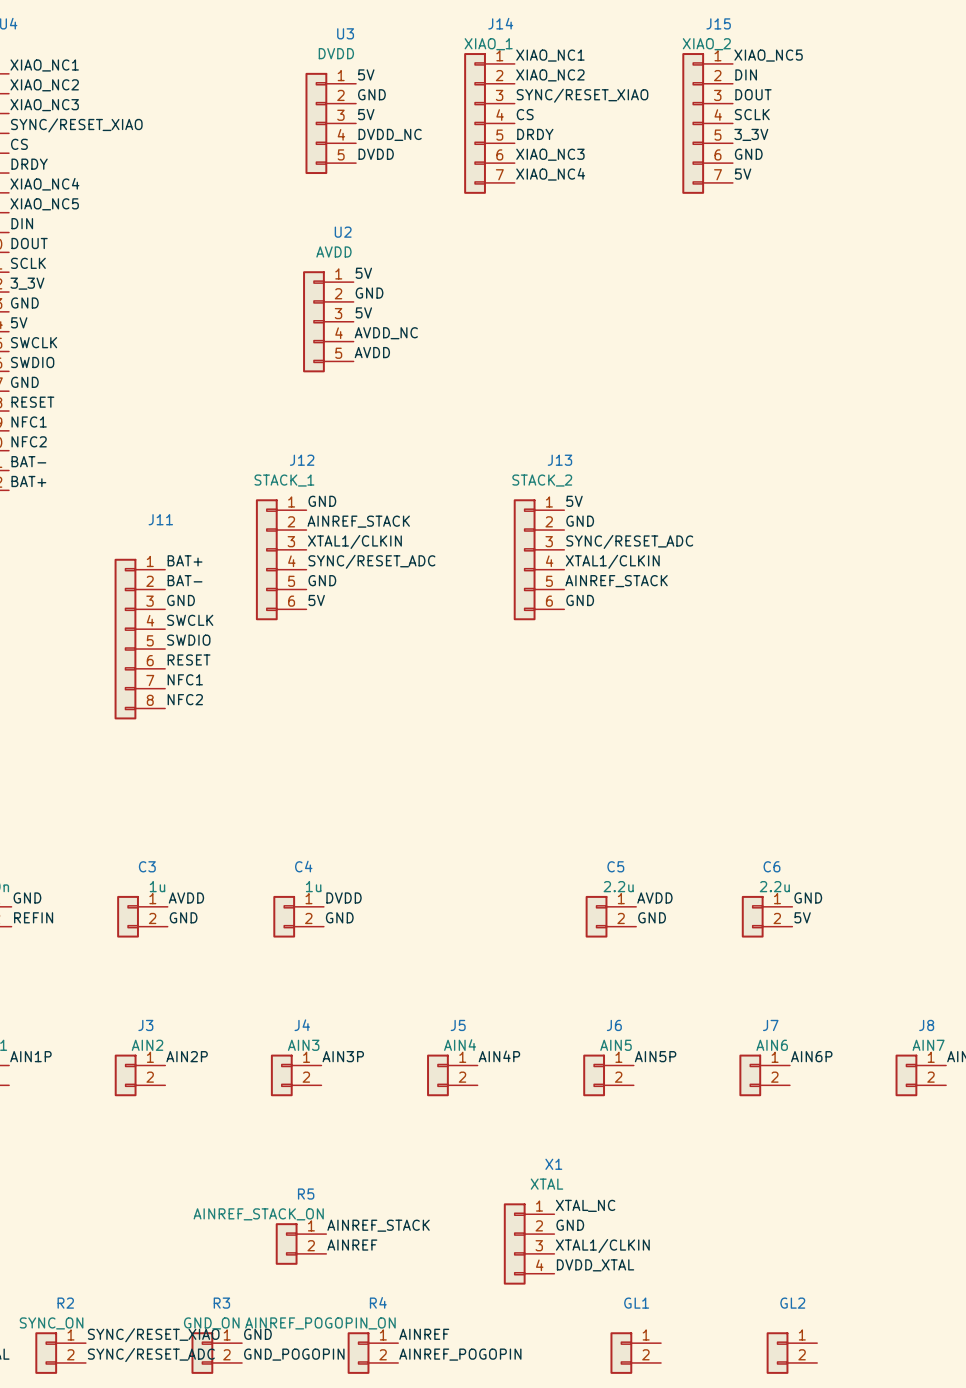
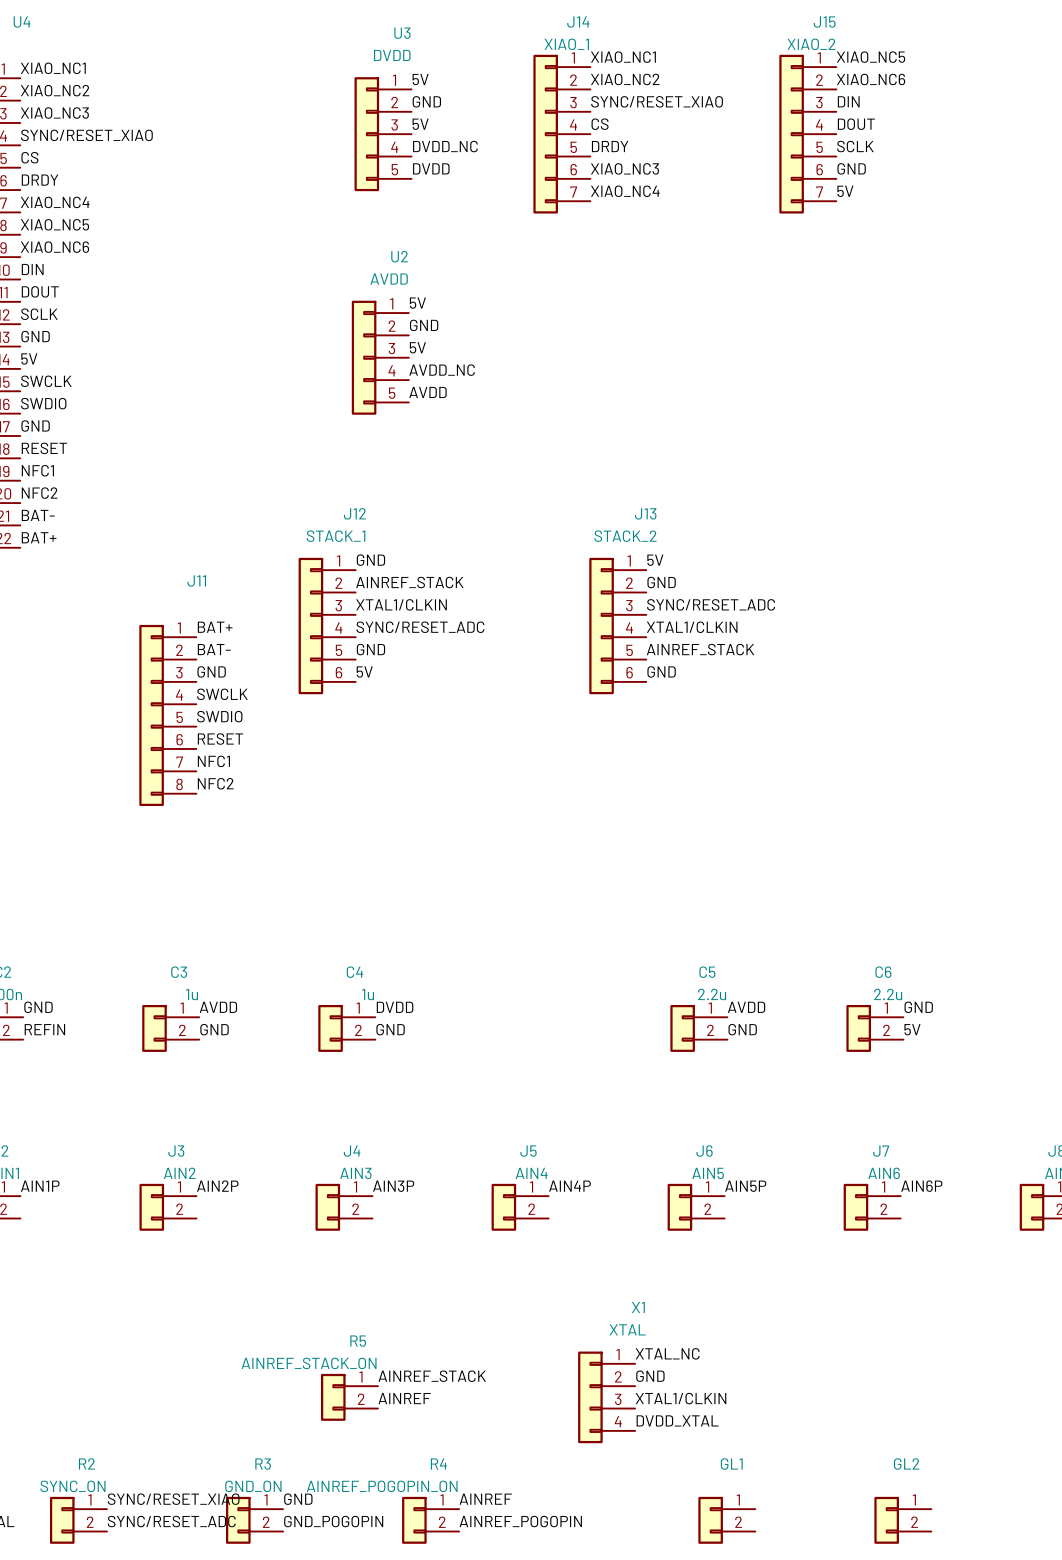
label: DIN (746, 74) -> XIAO_NC6 (871, 79)
label: DOUT (753, 94) -> DIN (848, 101)
label: SCLK (752, 114) -> DOUT (856, 124)
label: 3_3V (751, 134) -> SCLK (855, 146)
label: DIN (22, 223) -> XIAO_NC6 (54, 247)
label: DOUT (29, 243) -> DIN (32, 269)
label: SCLK (28, 263) -> DOUT (40, 291)
label: 3_3V (27, 283) -> SCLK (39, 314)

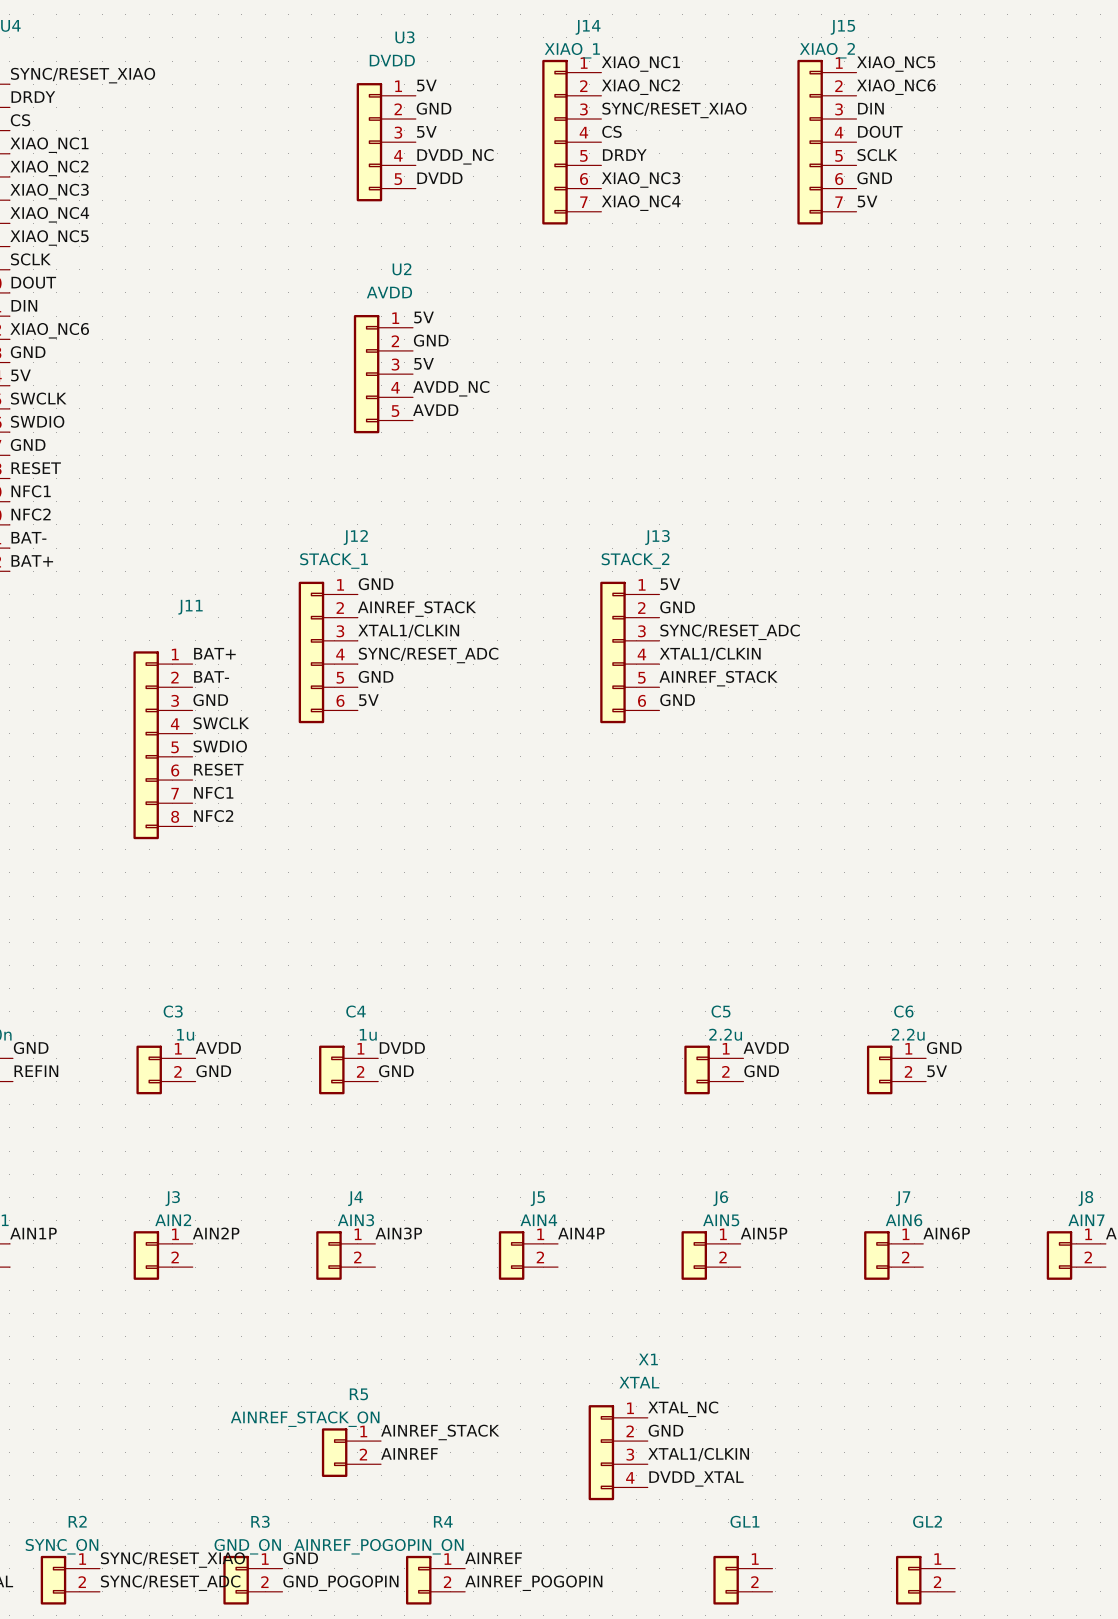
label: XIAO_NC1 (53, 68) -> SYNC/RESET_XIAO (83, 75)
label: XIAO_NC2 (55, 90) -> DRDY (33, 97)
label: XIAO_NC3 (54, 113) -> CS (20, 120)
label: SYNC/RESET_XIAO (86, 135) -> XIAO_NC1 (49, 145)
label: CS (29, 157) -> XIAO_NC2 (49, 168)
label: DRDY (40, 180) -> XIAO_NC3 (49, 191)
label: XIAO_NC6 (54, 247) -> SCLK (30, 259)
label: DIN (32, 269) -> DOUT (33, 282)
label: DOUT (40, 291) -> DIN (24, 305)
label: SCLK (39, 314) -> XIAO_NC6 (49, 330)

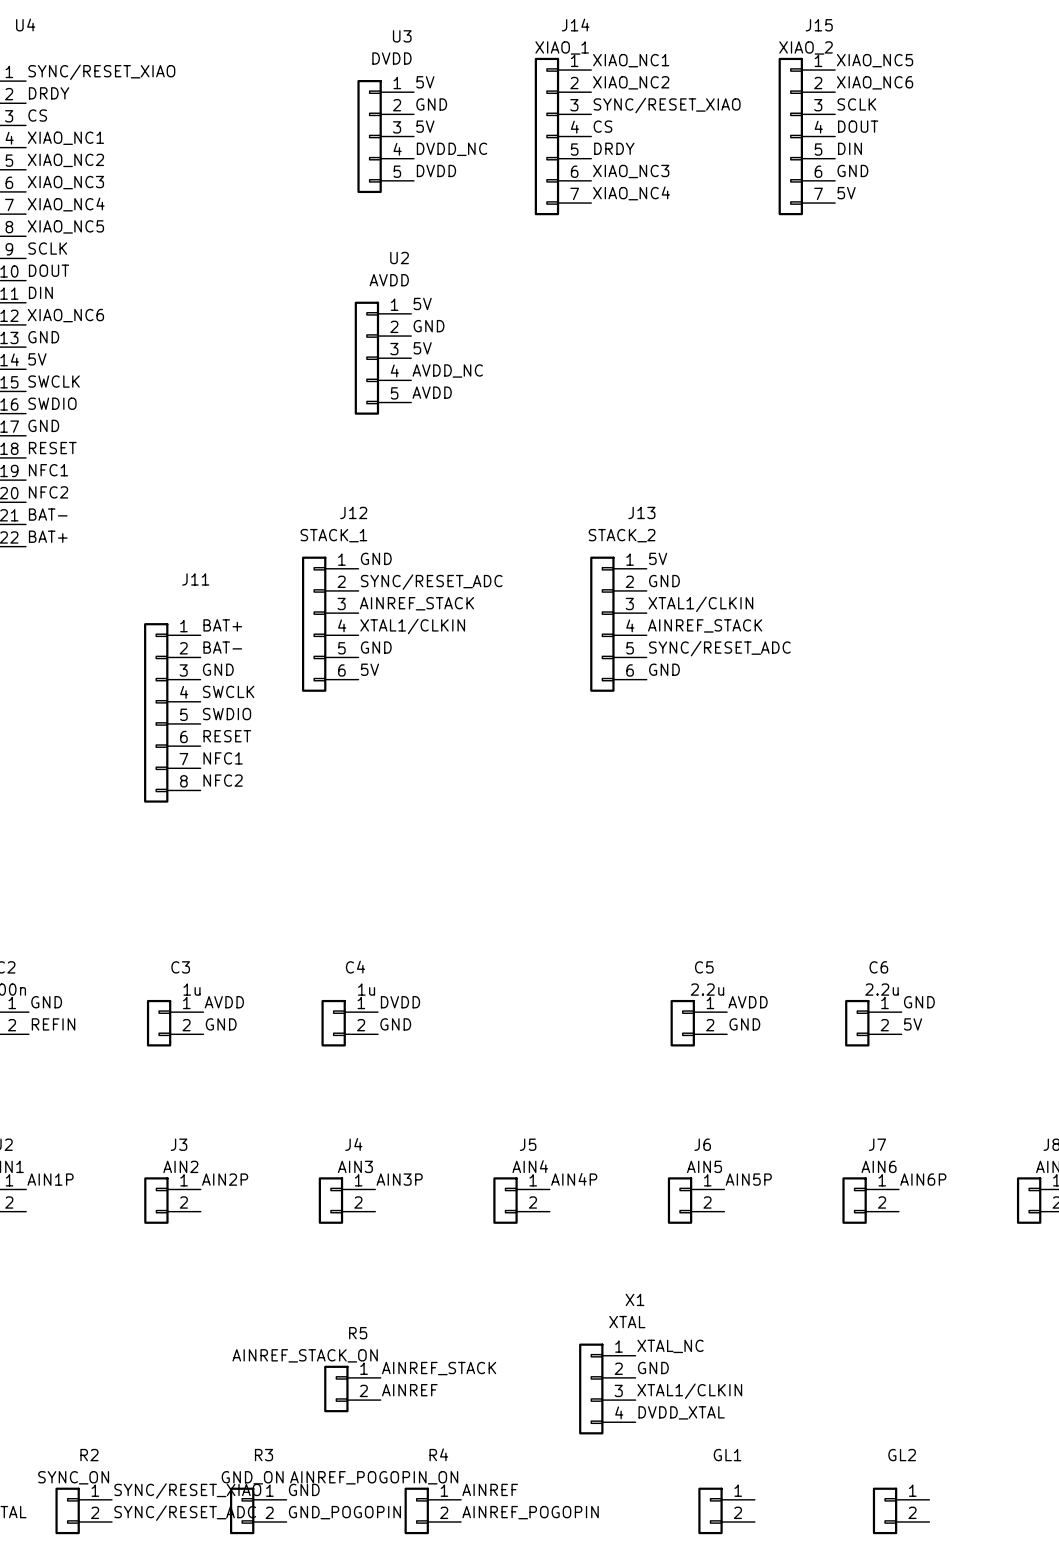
label: DIN (870, 108) -> SCLK (856, 104)
label: SCLK (877, 155) -> DIN (849, 148)
label: AINREF_STACK (417, 609) -> SYNC/RESET_ADC (431, 582)
label: XTAL1/CLKIN (408, 631) -> AINREF_STACK (416, 603)
label: SYNC/RESET_ADC (730, 632) -> XTAL1/CLKIN (700, 604)
label: XTAL1/CLKIN (710, 654) -> AINREF_STACK (705, 625)
label: SYNC/RESET_ADC (428, 655) -> XTAL1/CLKIN (412, 626)
label: AINREF_STACK (718, 678) -> SYNC/RESET_ADC (719, 648)

